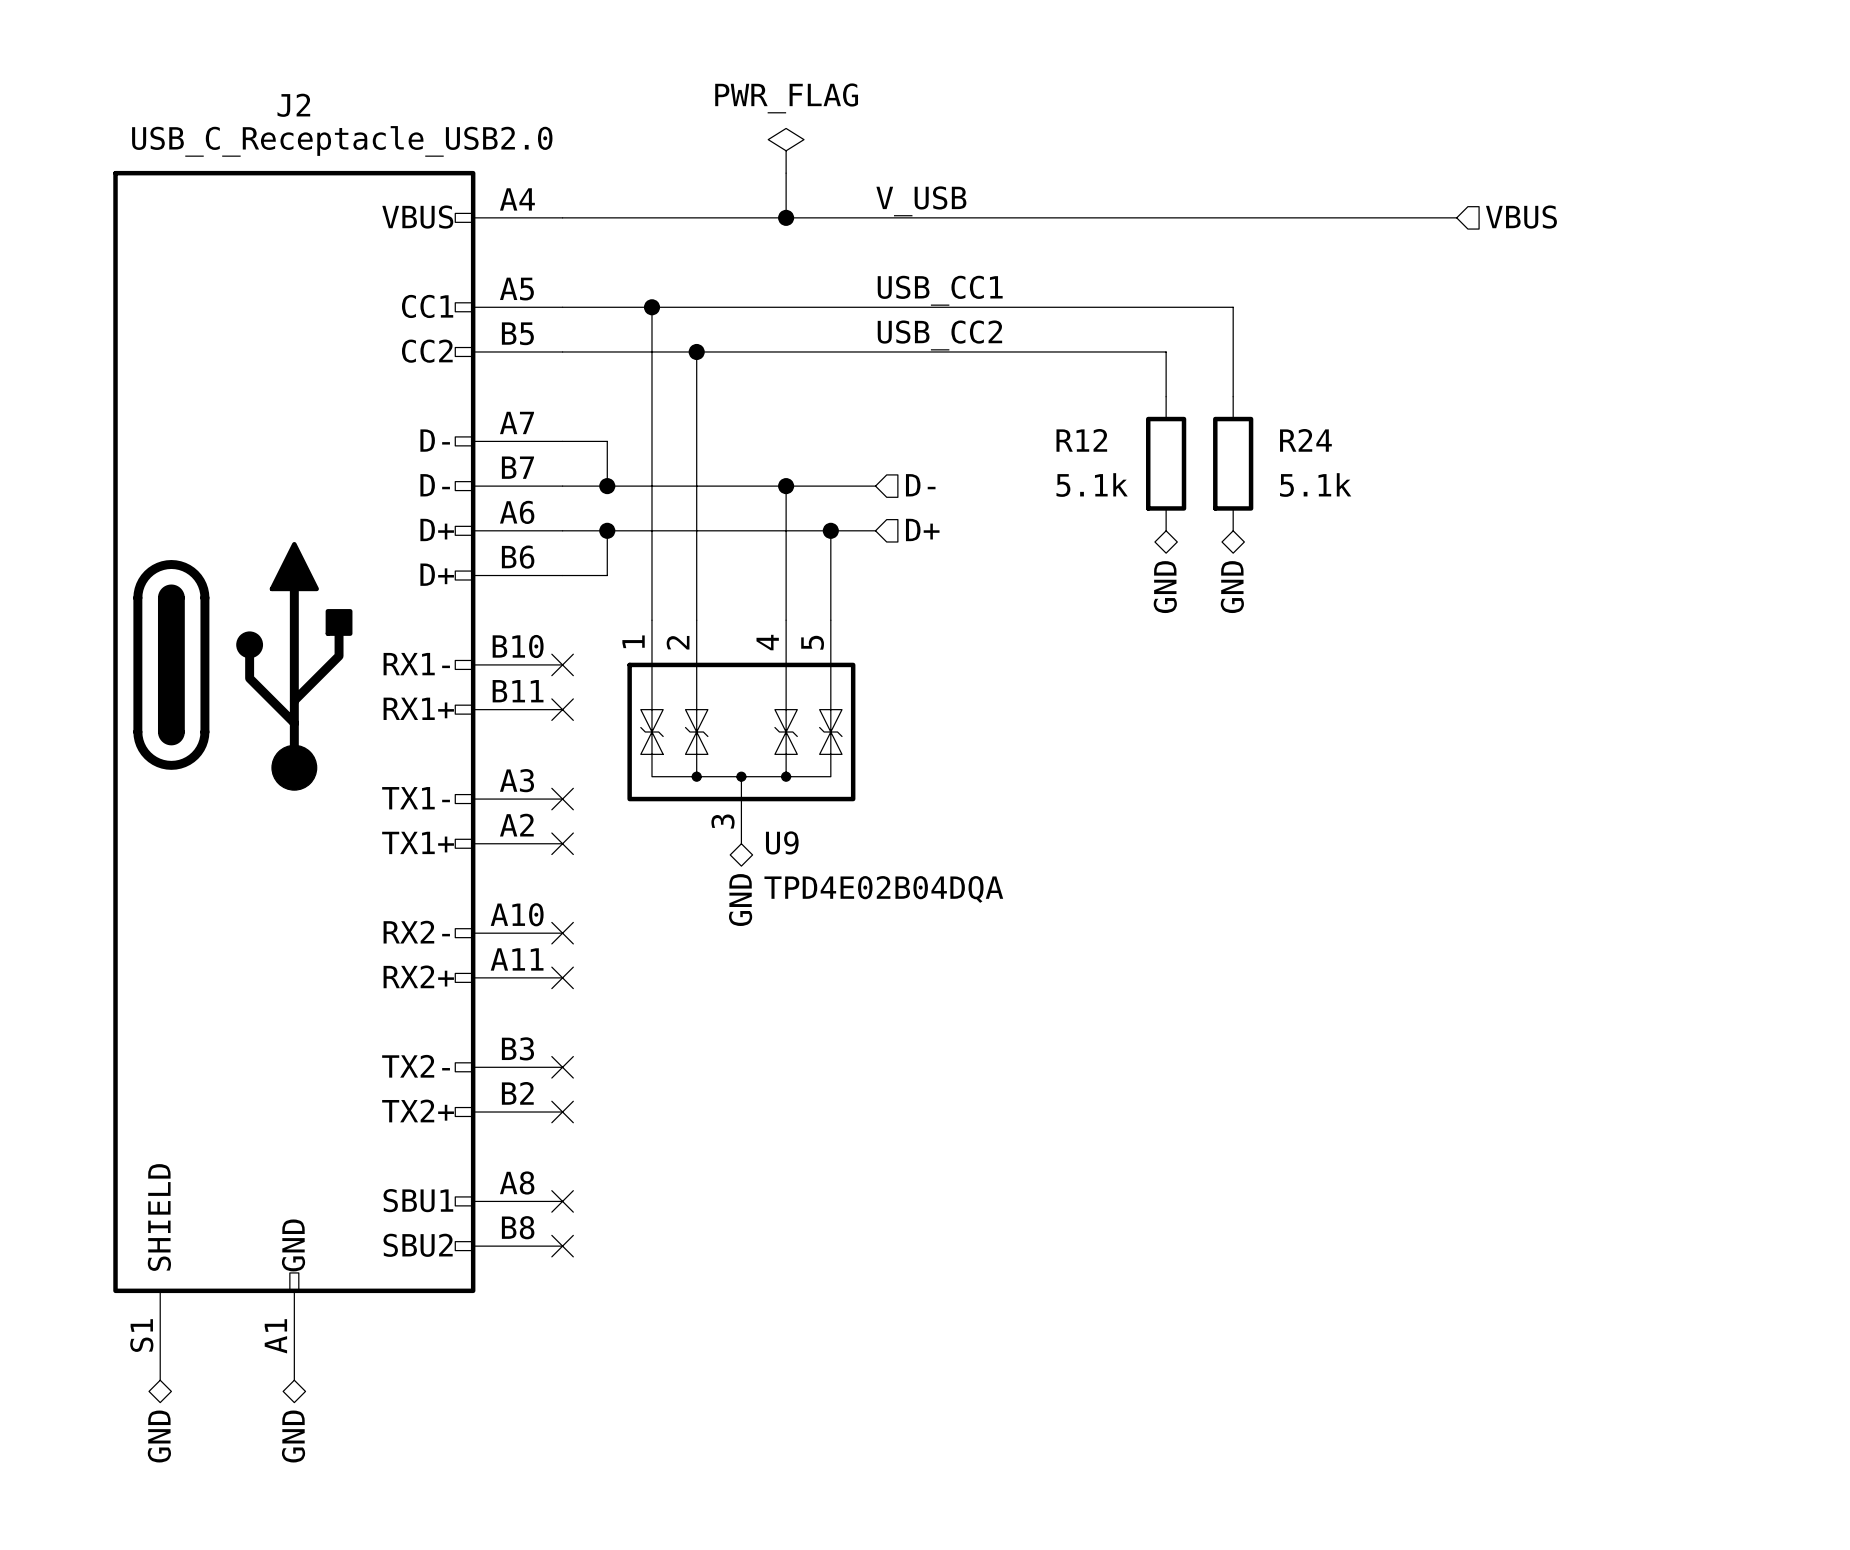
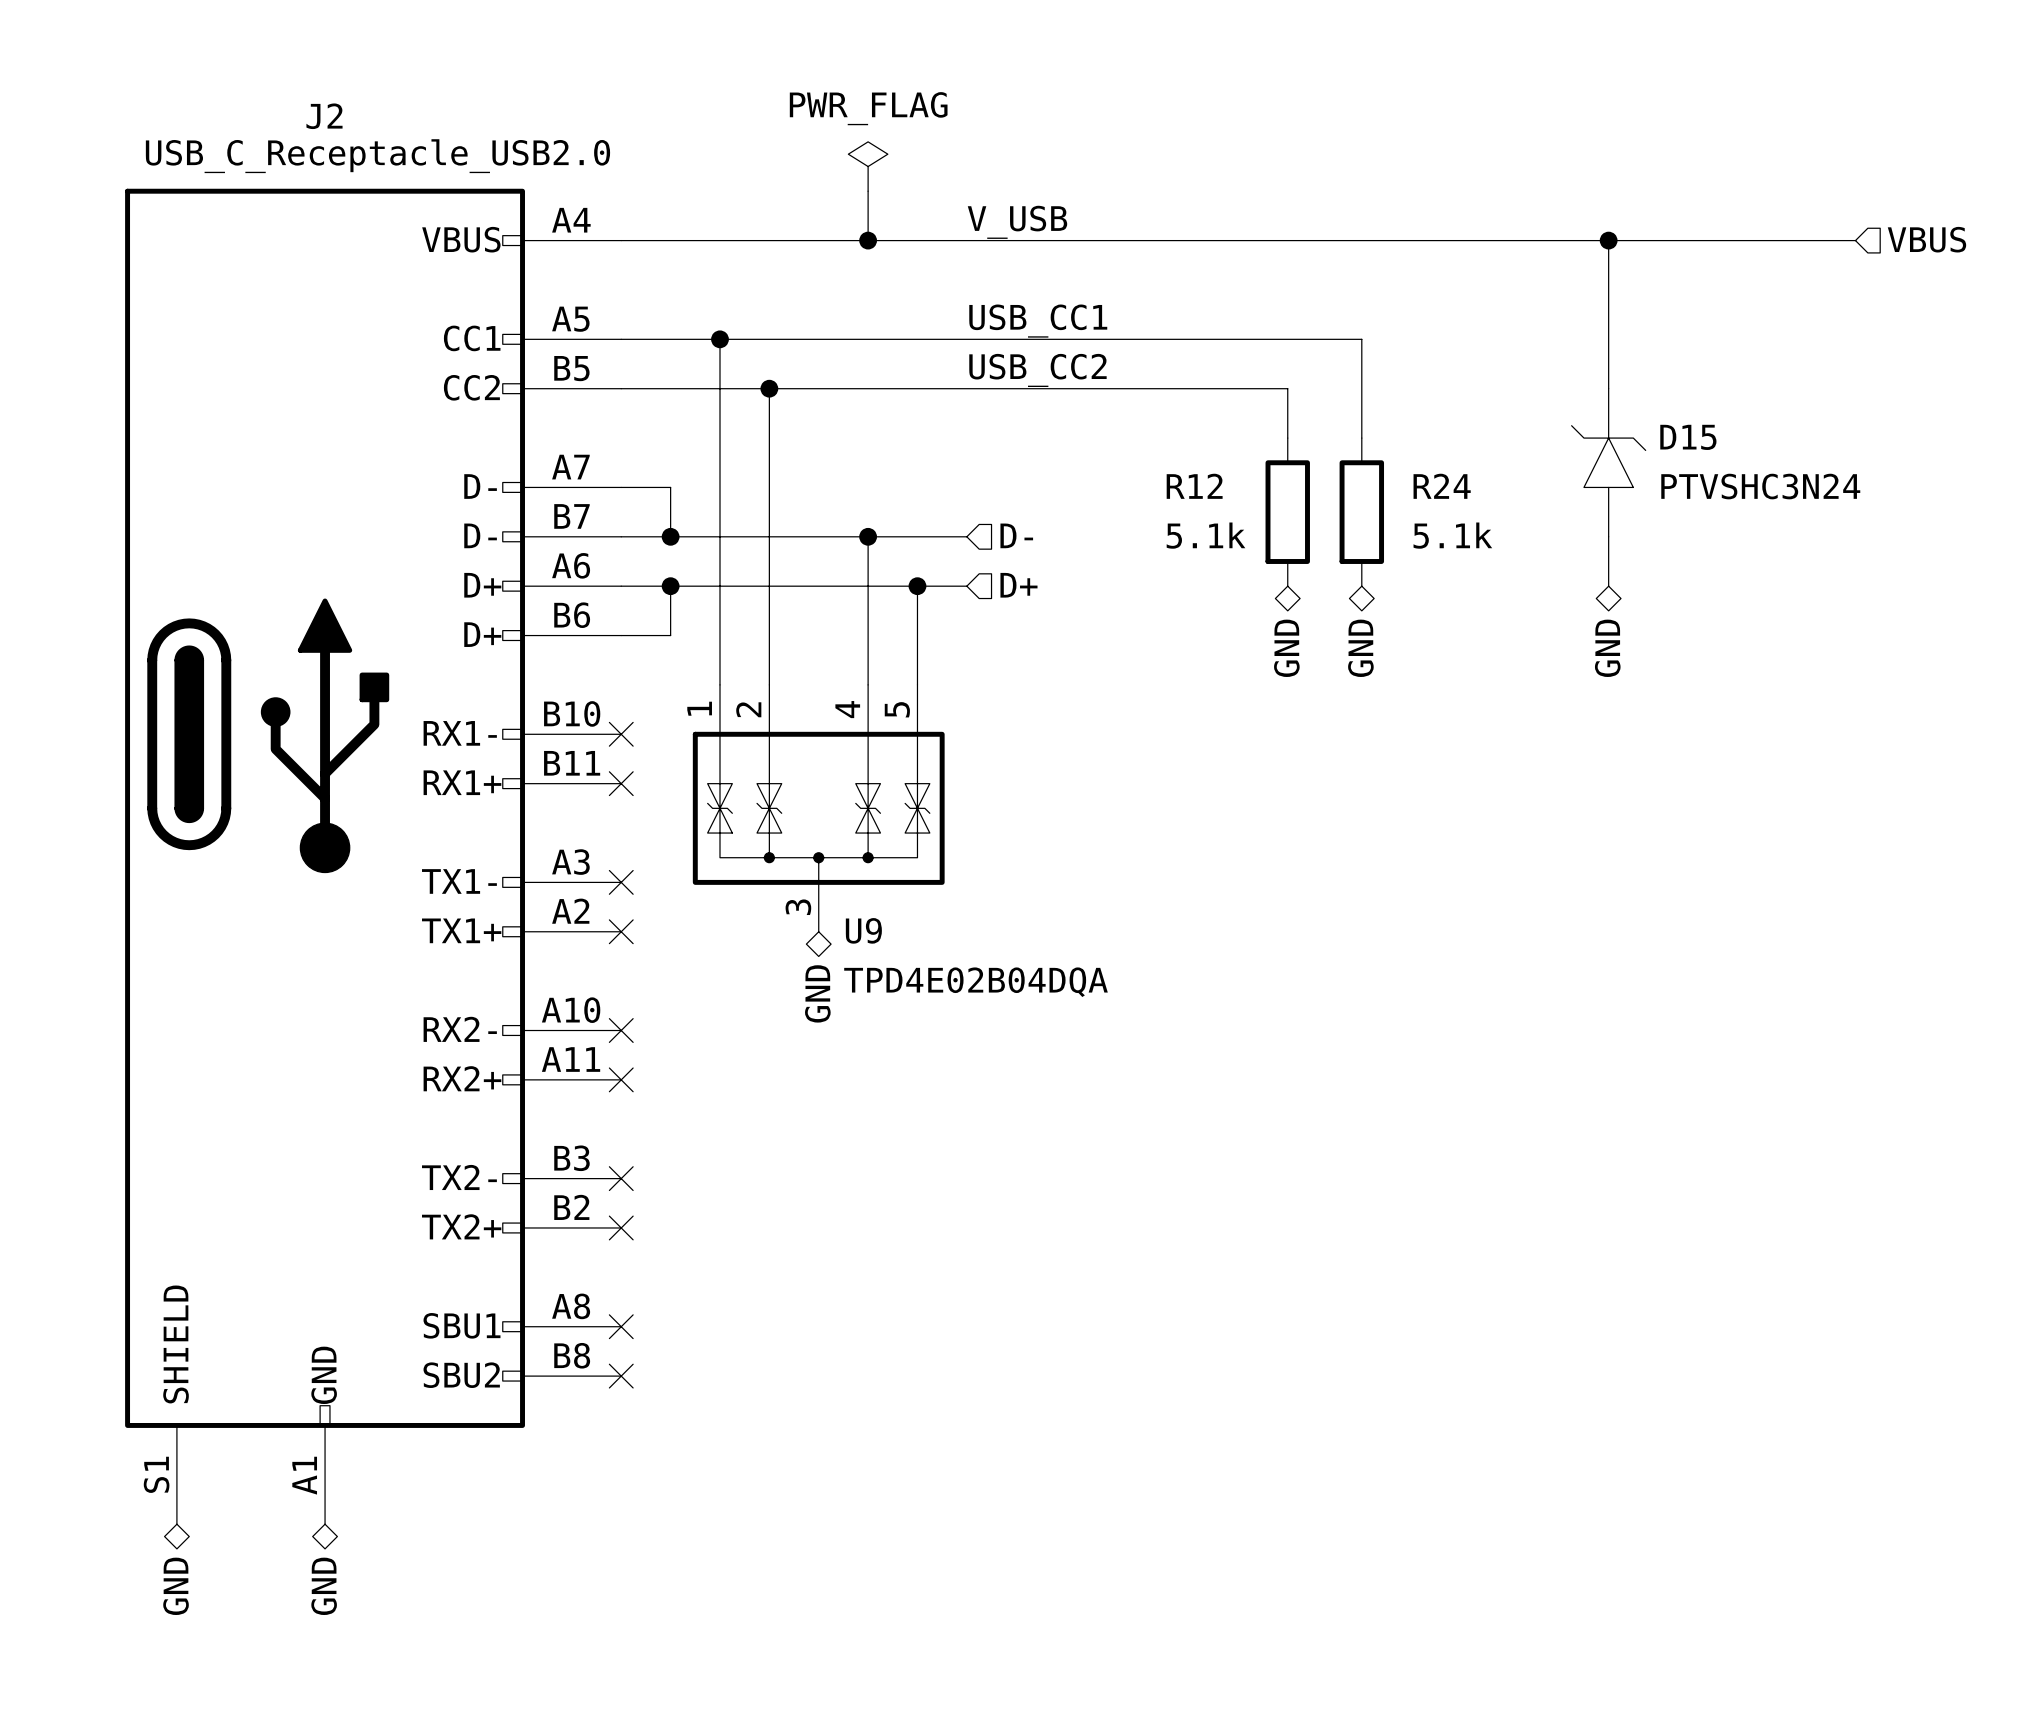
junction: none -> (1608, 240)
hierarchical label position: VBUS (1521, 217) -> VBUS (1926, 239)
wire: none -> (1855, 240) (1608, 240) (1608, 388)
D15: none -> PTVSHC3N24 (1608, 462)
wire: none -> (1608, 536) (1608, 586)
hierarchical label: none -> GND (1607, 648)

